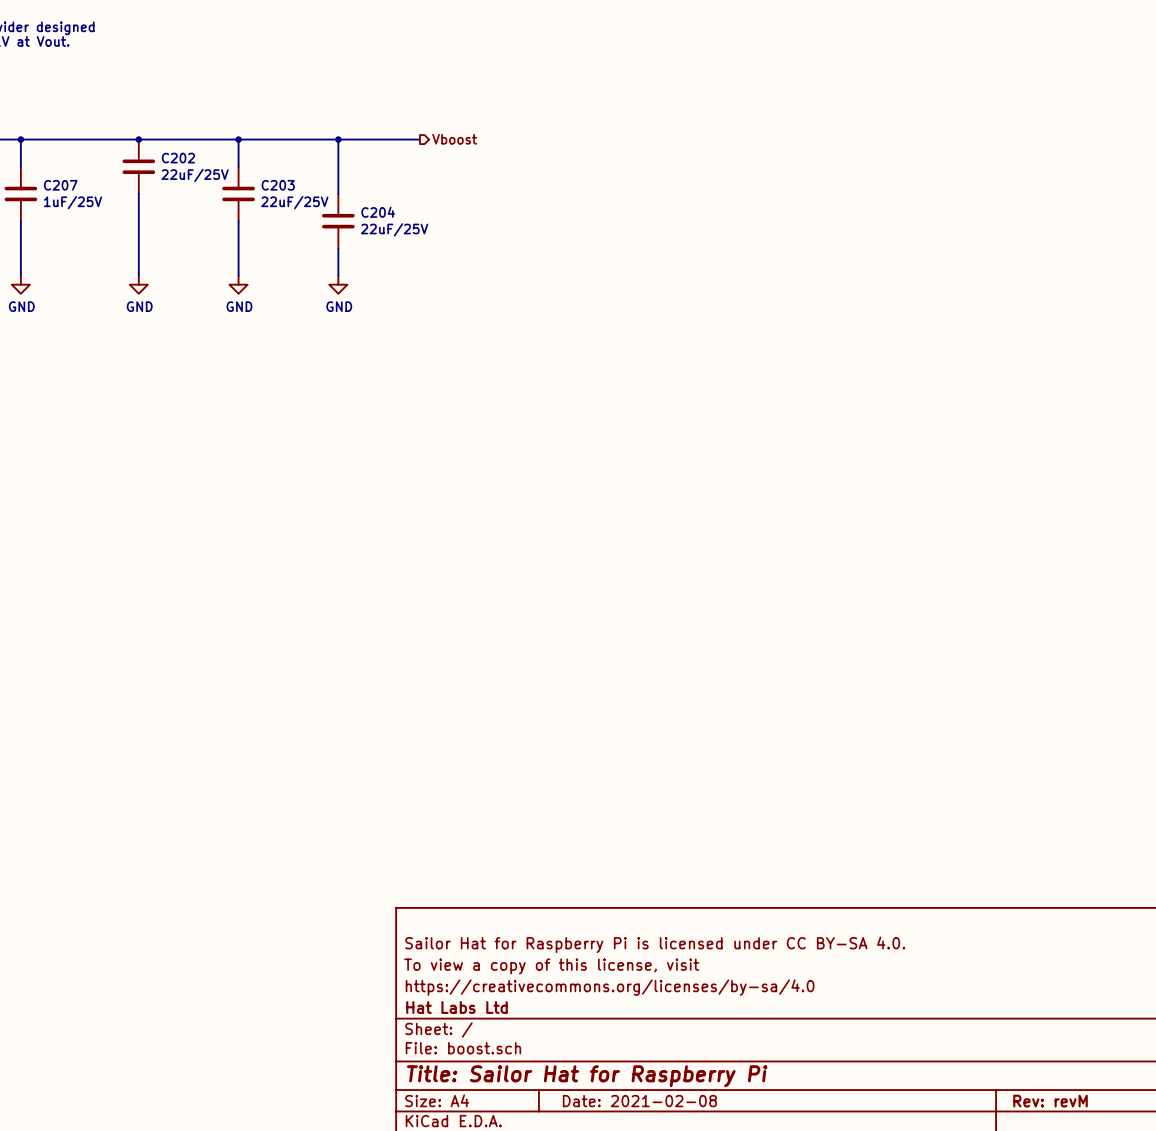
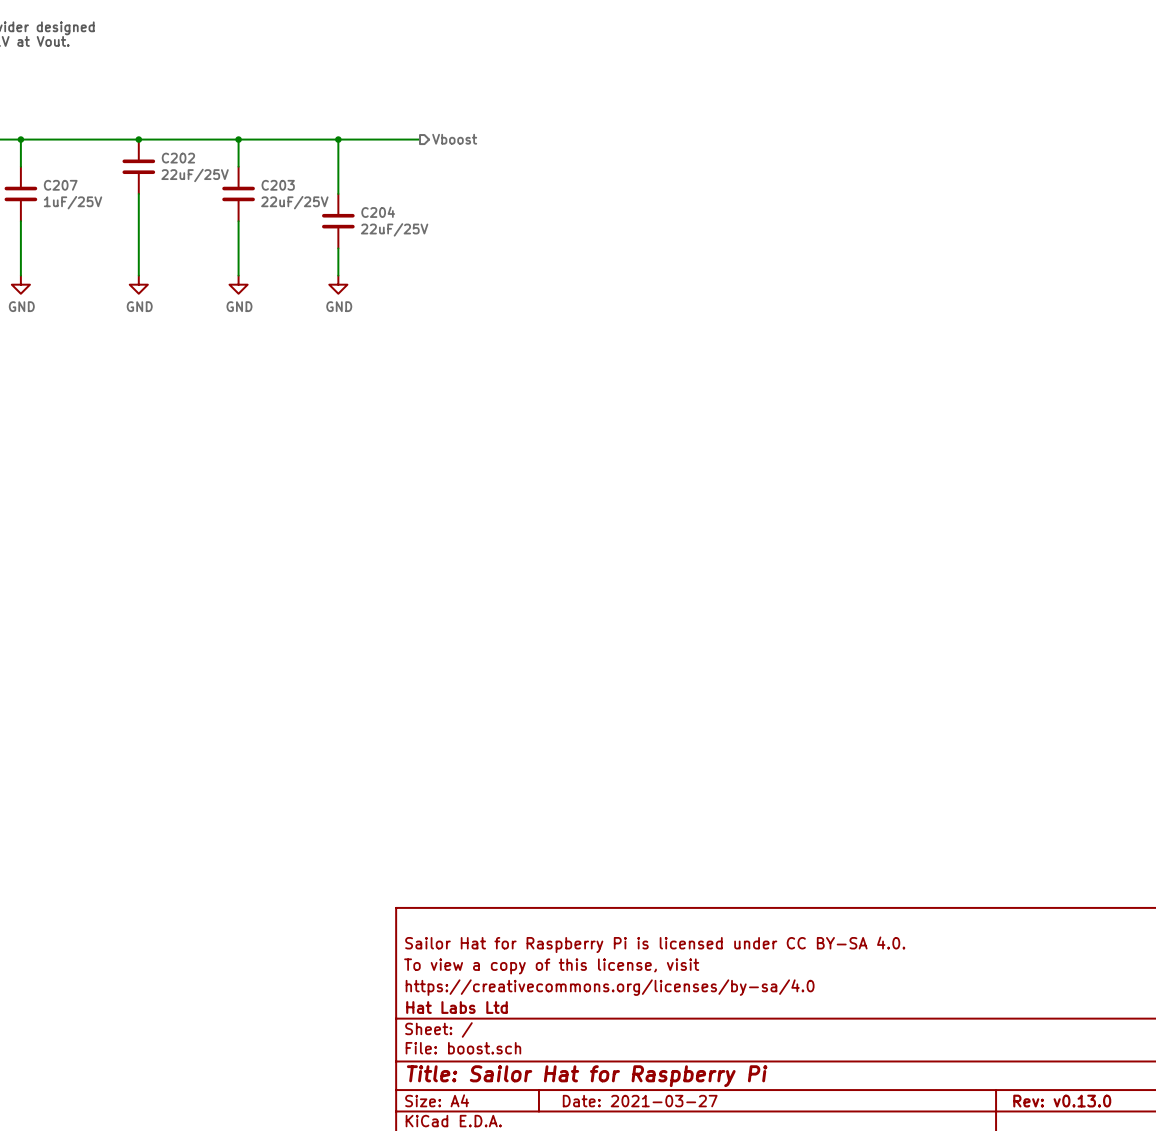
title block: Date: 2021-02-08 (639, 1101) -> Date: 2021-03-27 (640, 1101)
title block: Rev: revM (1050, 1101) -> Rev: v0.13.0 (1062, 1101)

